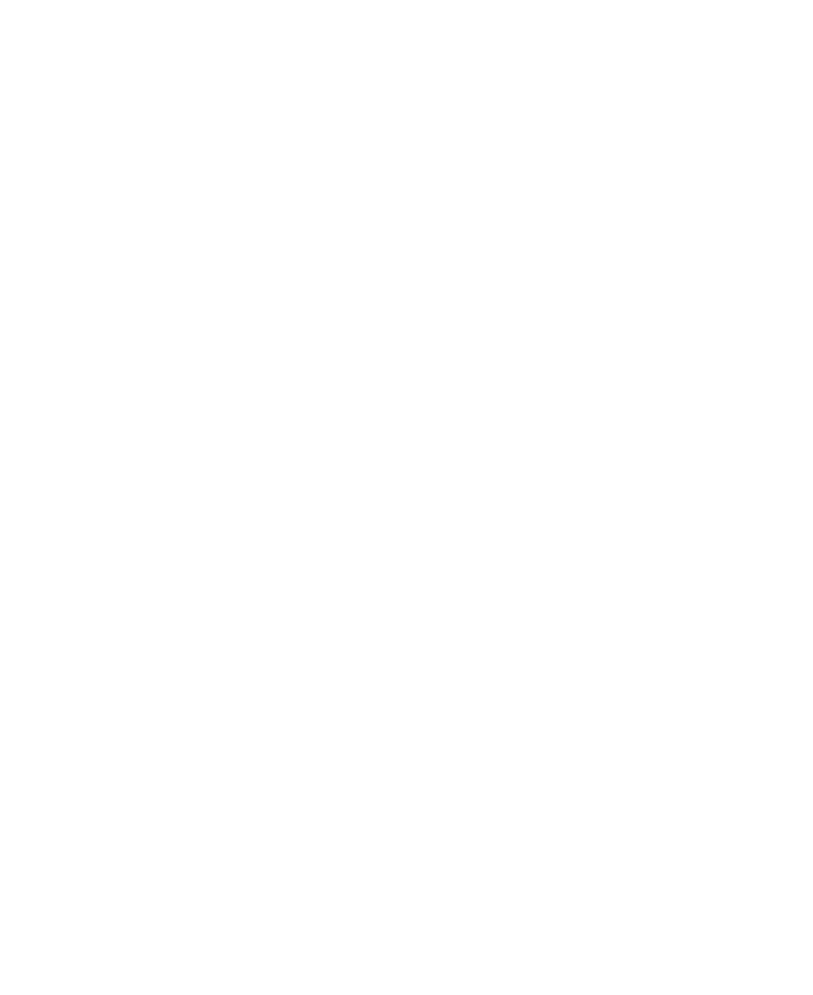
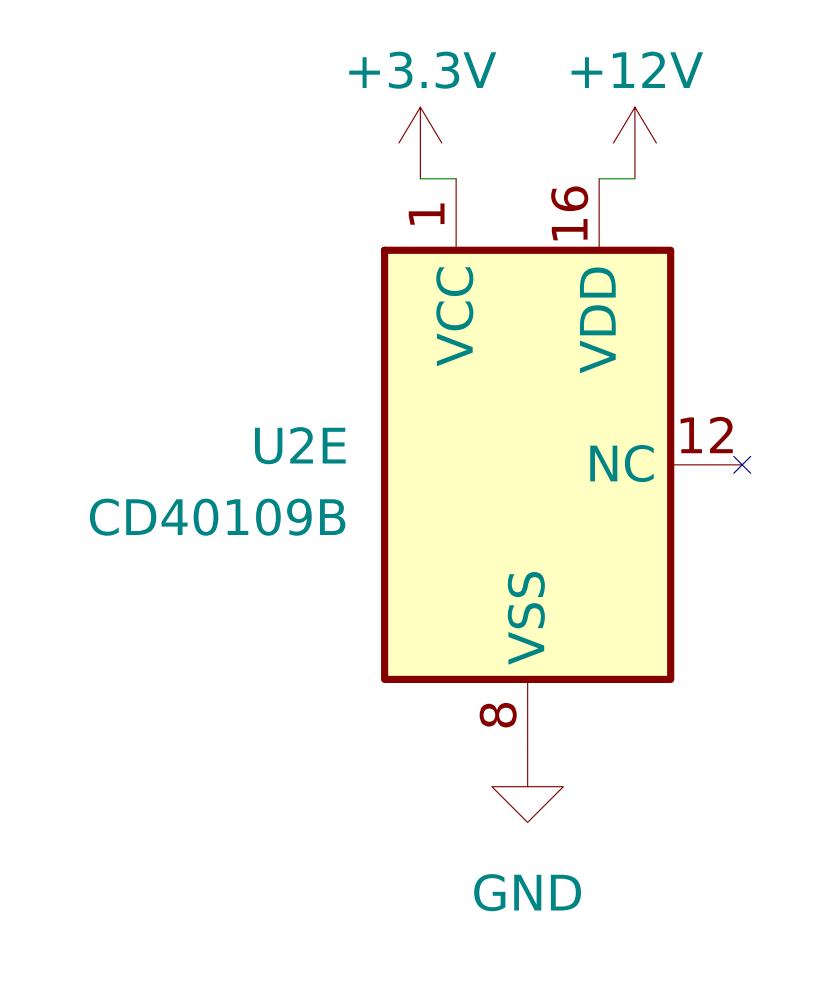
power symbol: none -> +3.3V (420, 143)
power symbol: none -> +12V (634, 143)
wire: none -> (420, 178) (456, 178)
wire: none -> (599, 178) (634, 178)
U2E: none -> CD40109B (565, 464)
power symbol: none -> GND (527, 786)

